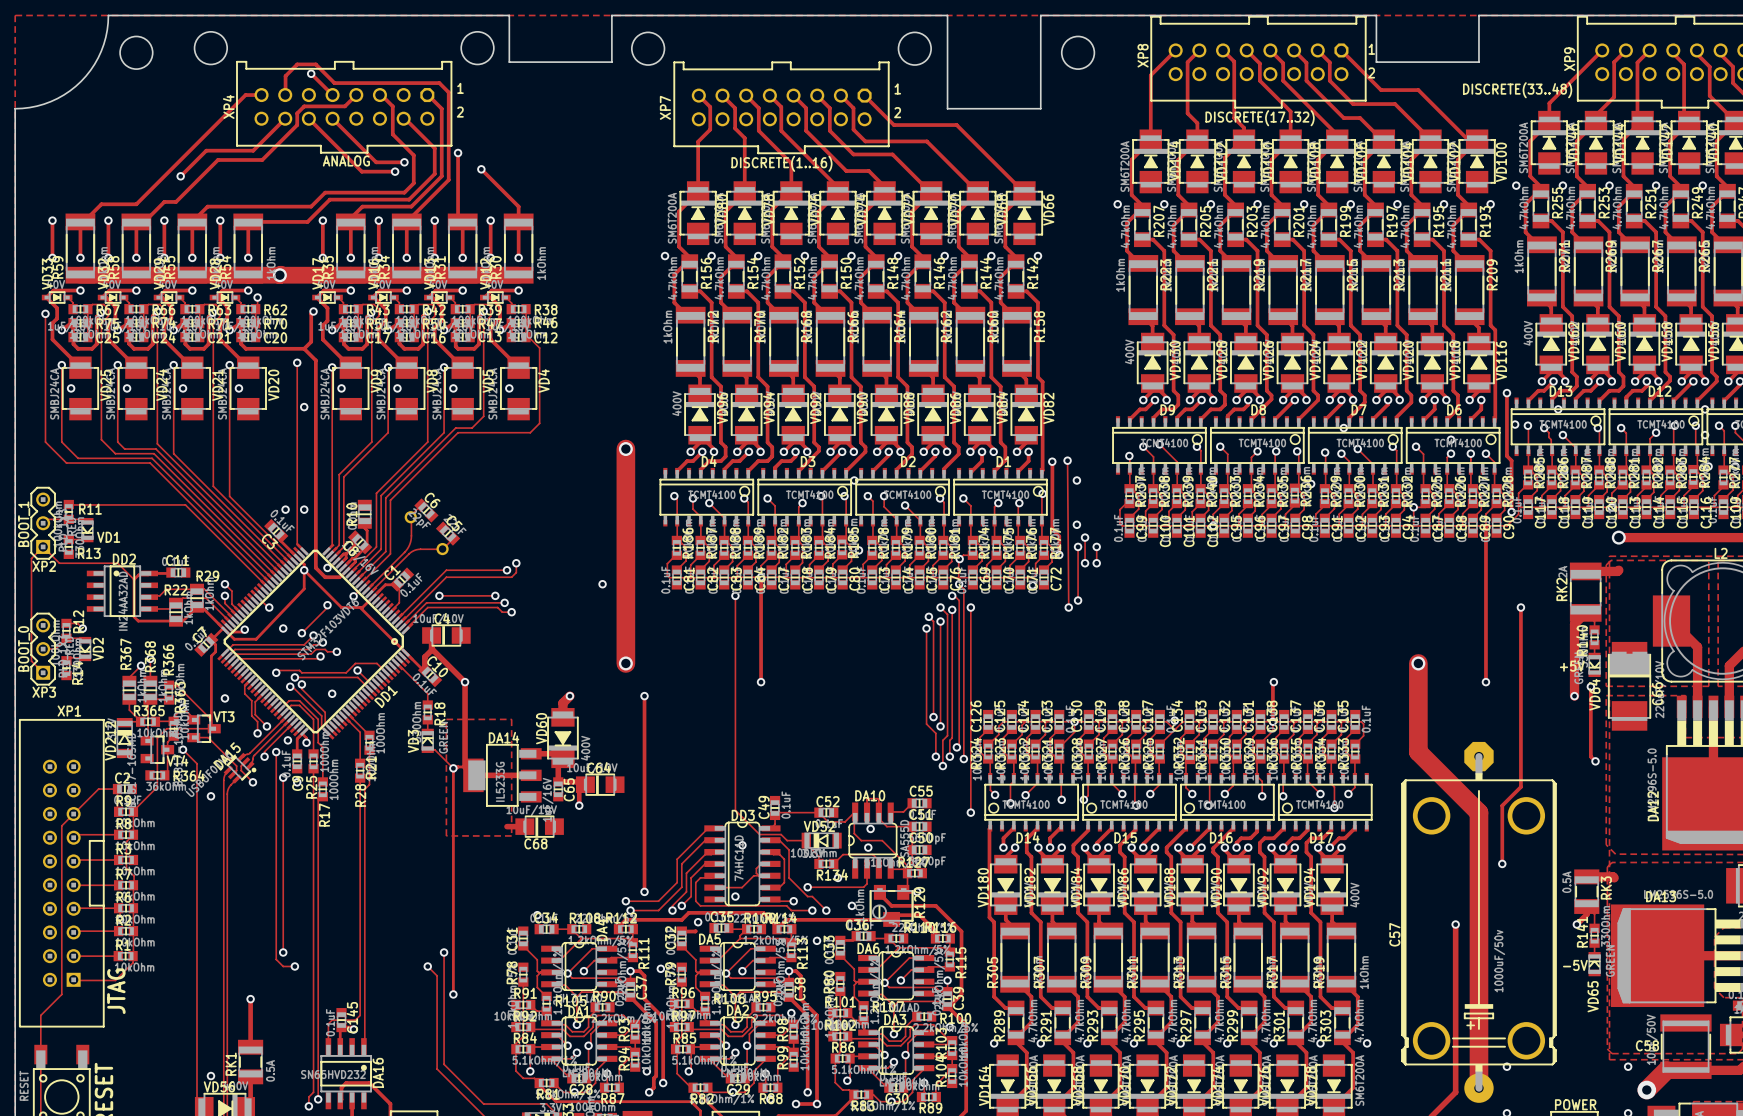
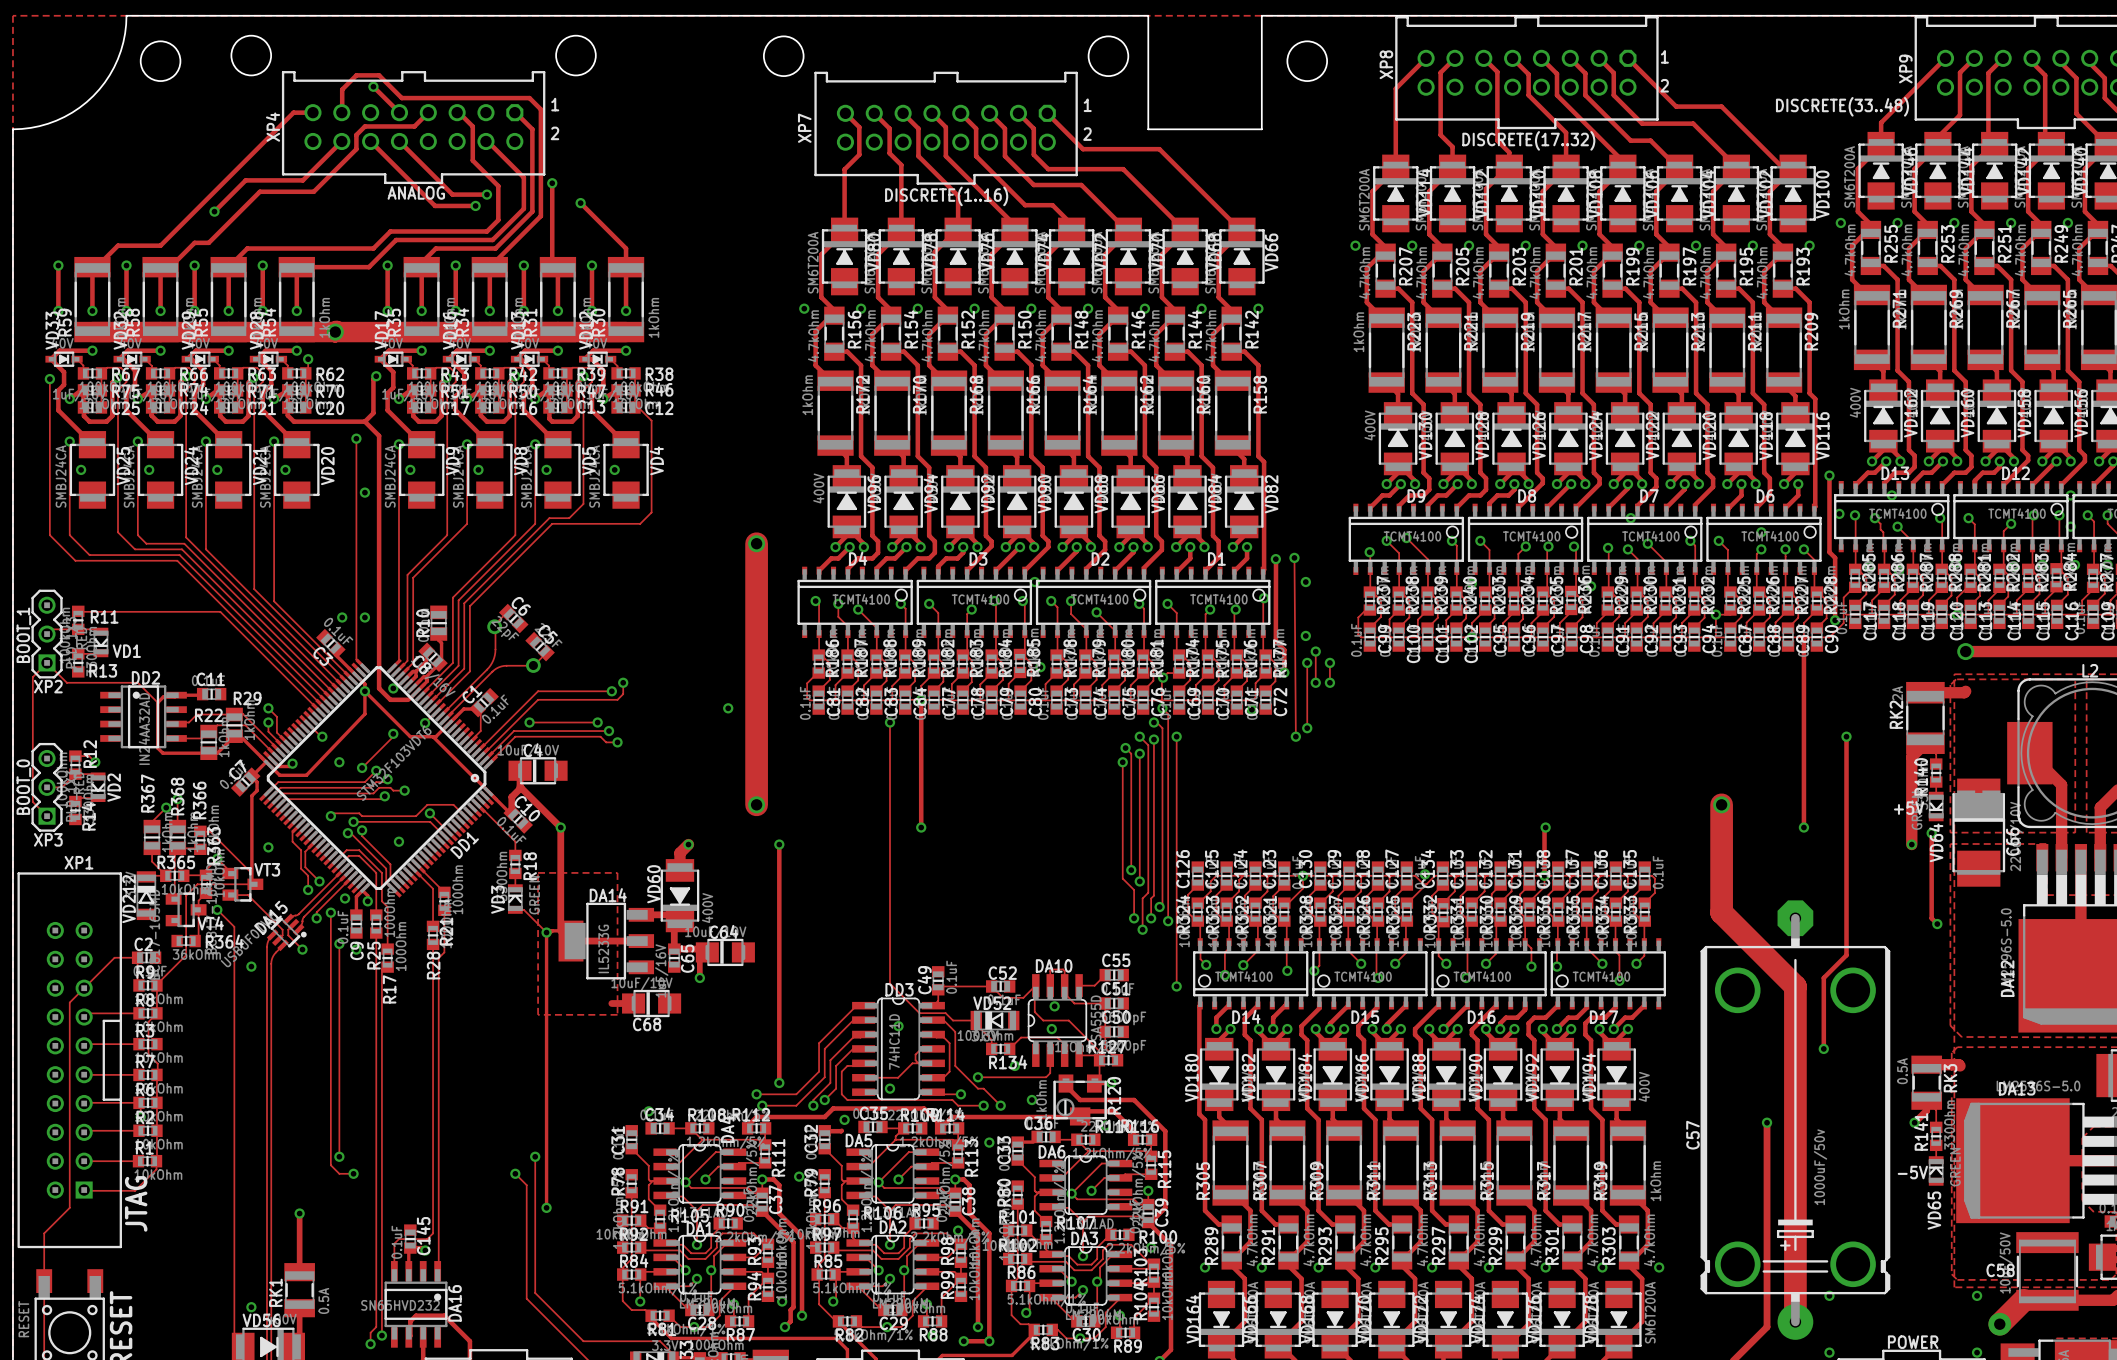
board edge: (509, 15) (509, 62) (611, 62) (611, 15) -> (614, 15) (739, 15)
board edge: (1376, 15) (1376, 62) (1478, 62) (1478, 15) -> (1670, 15) (1795, 15)

